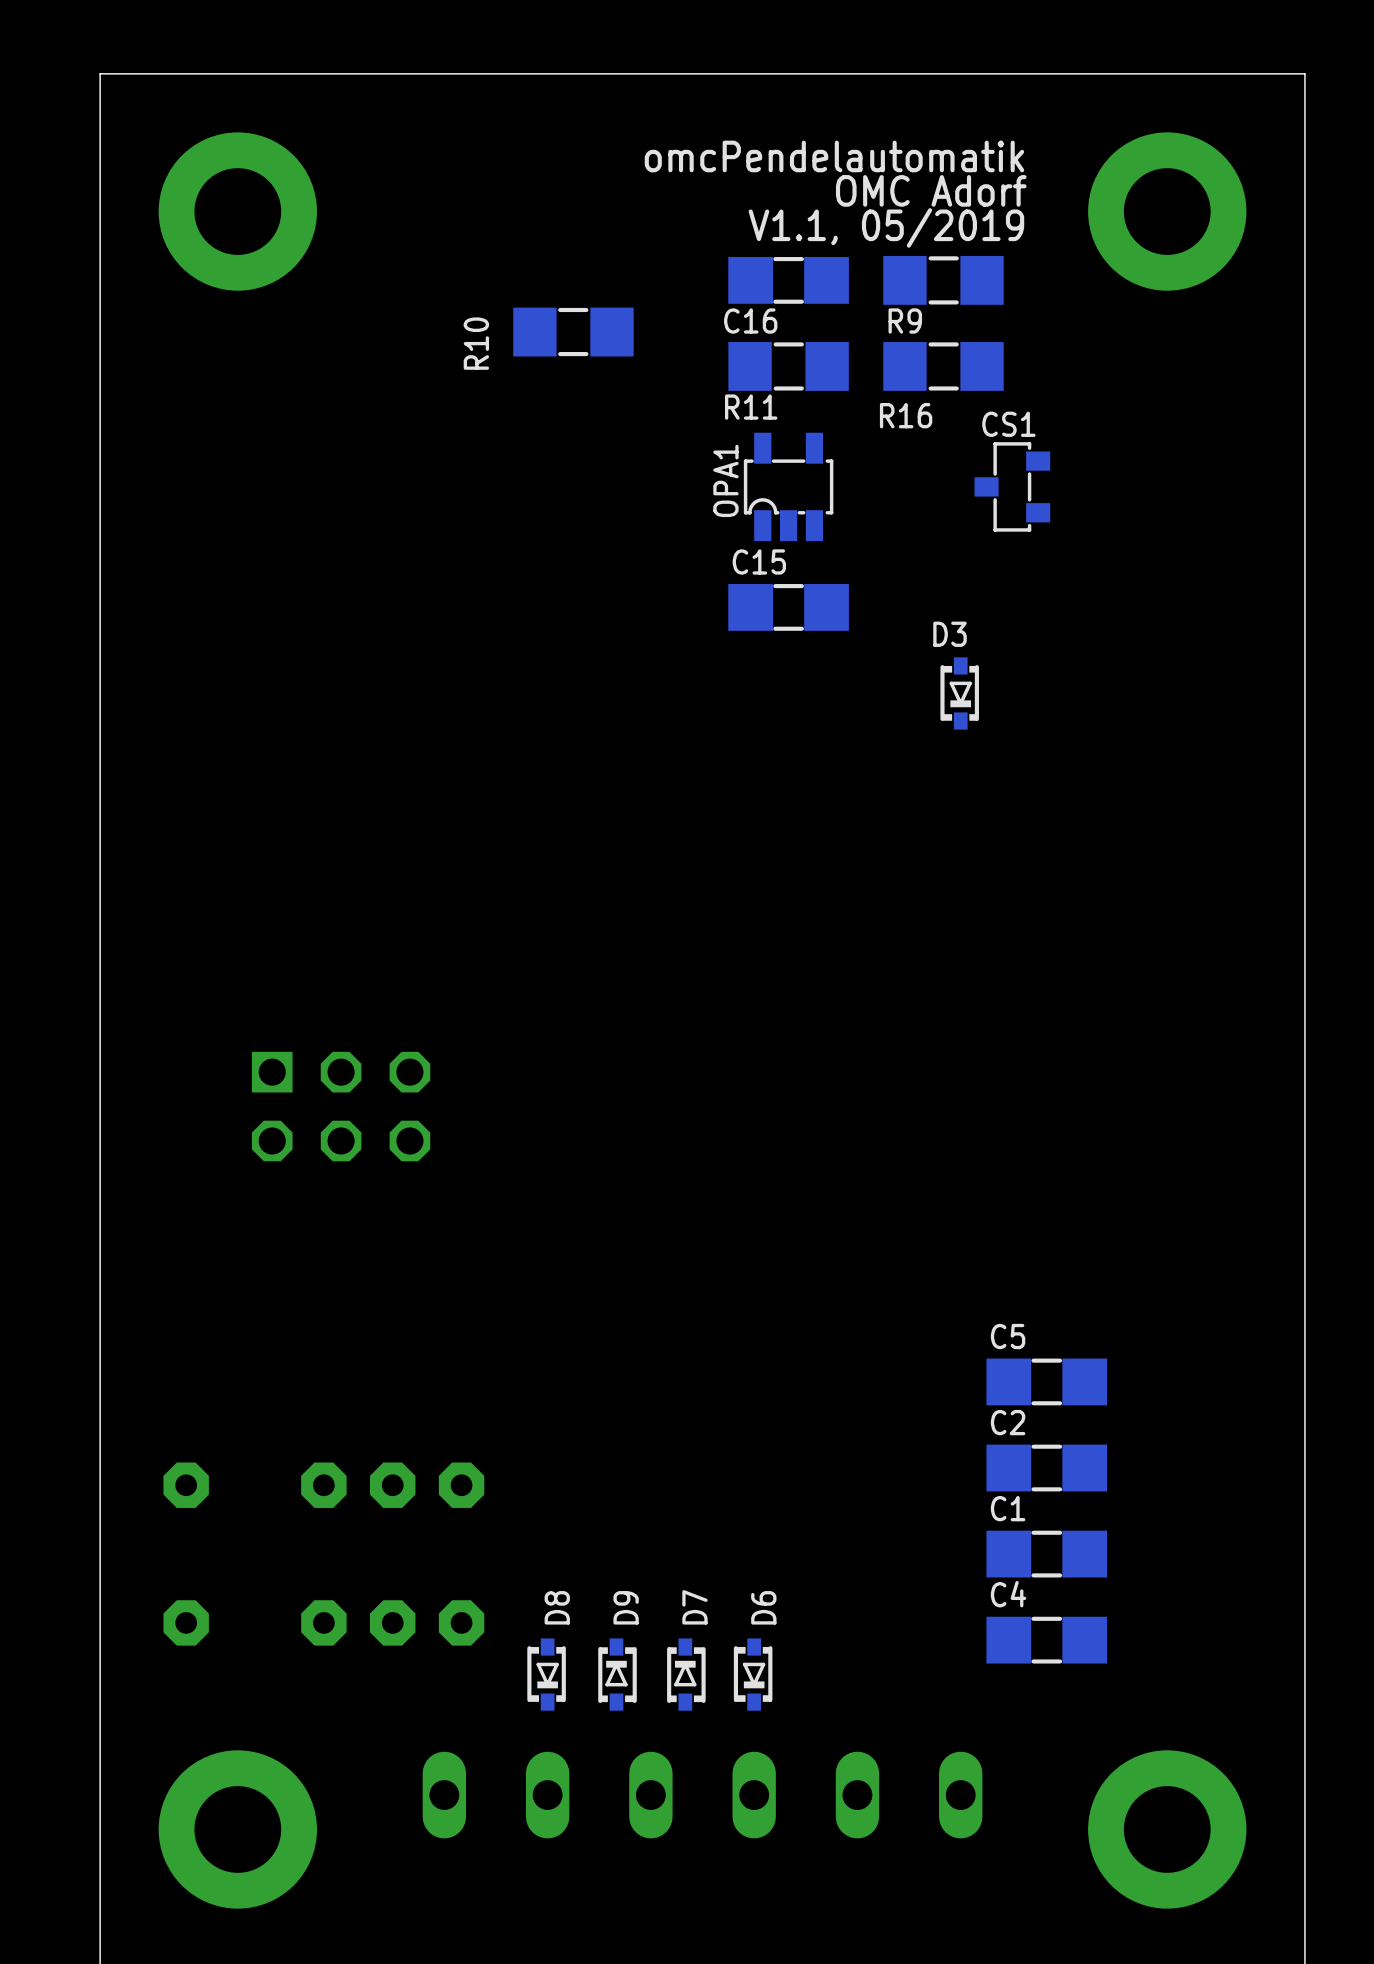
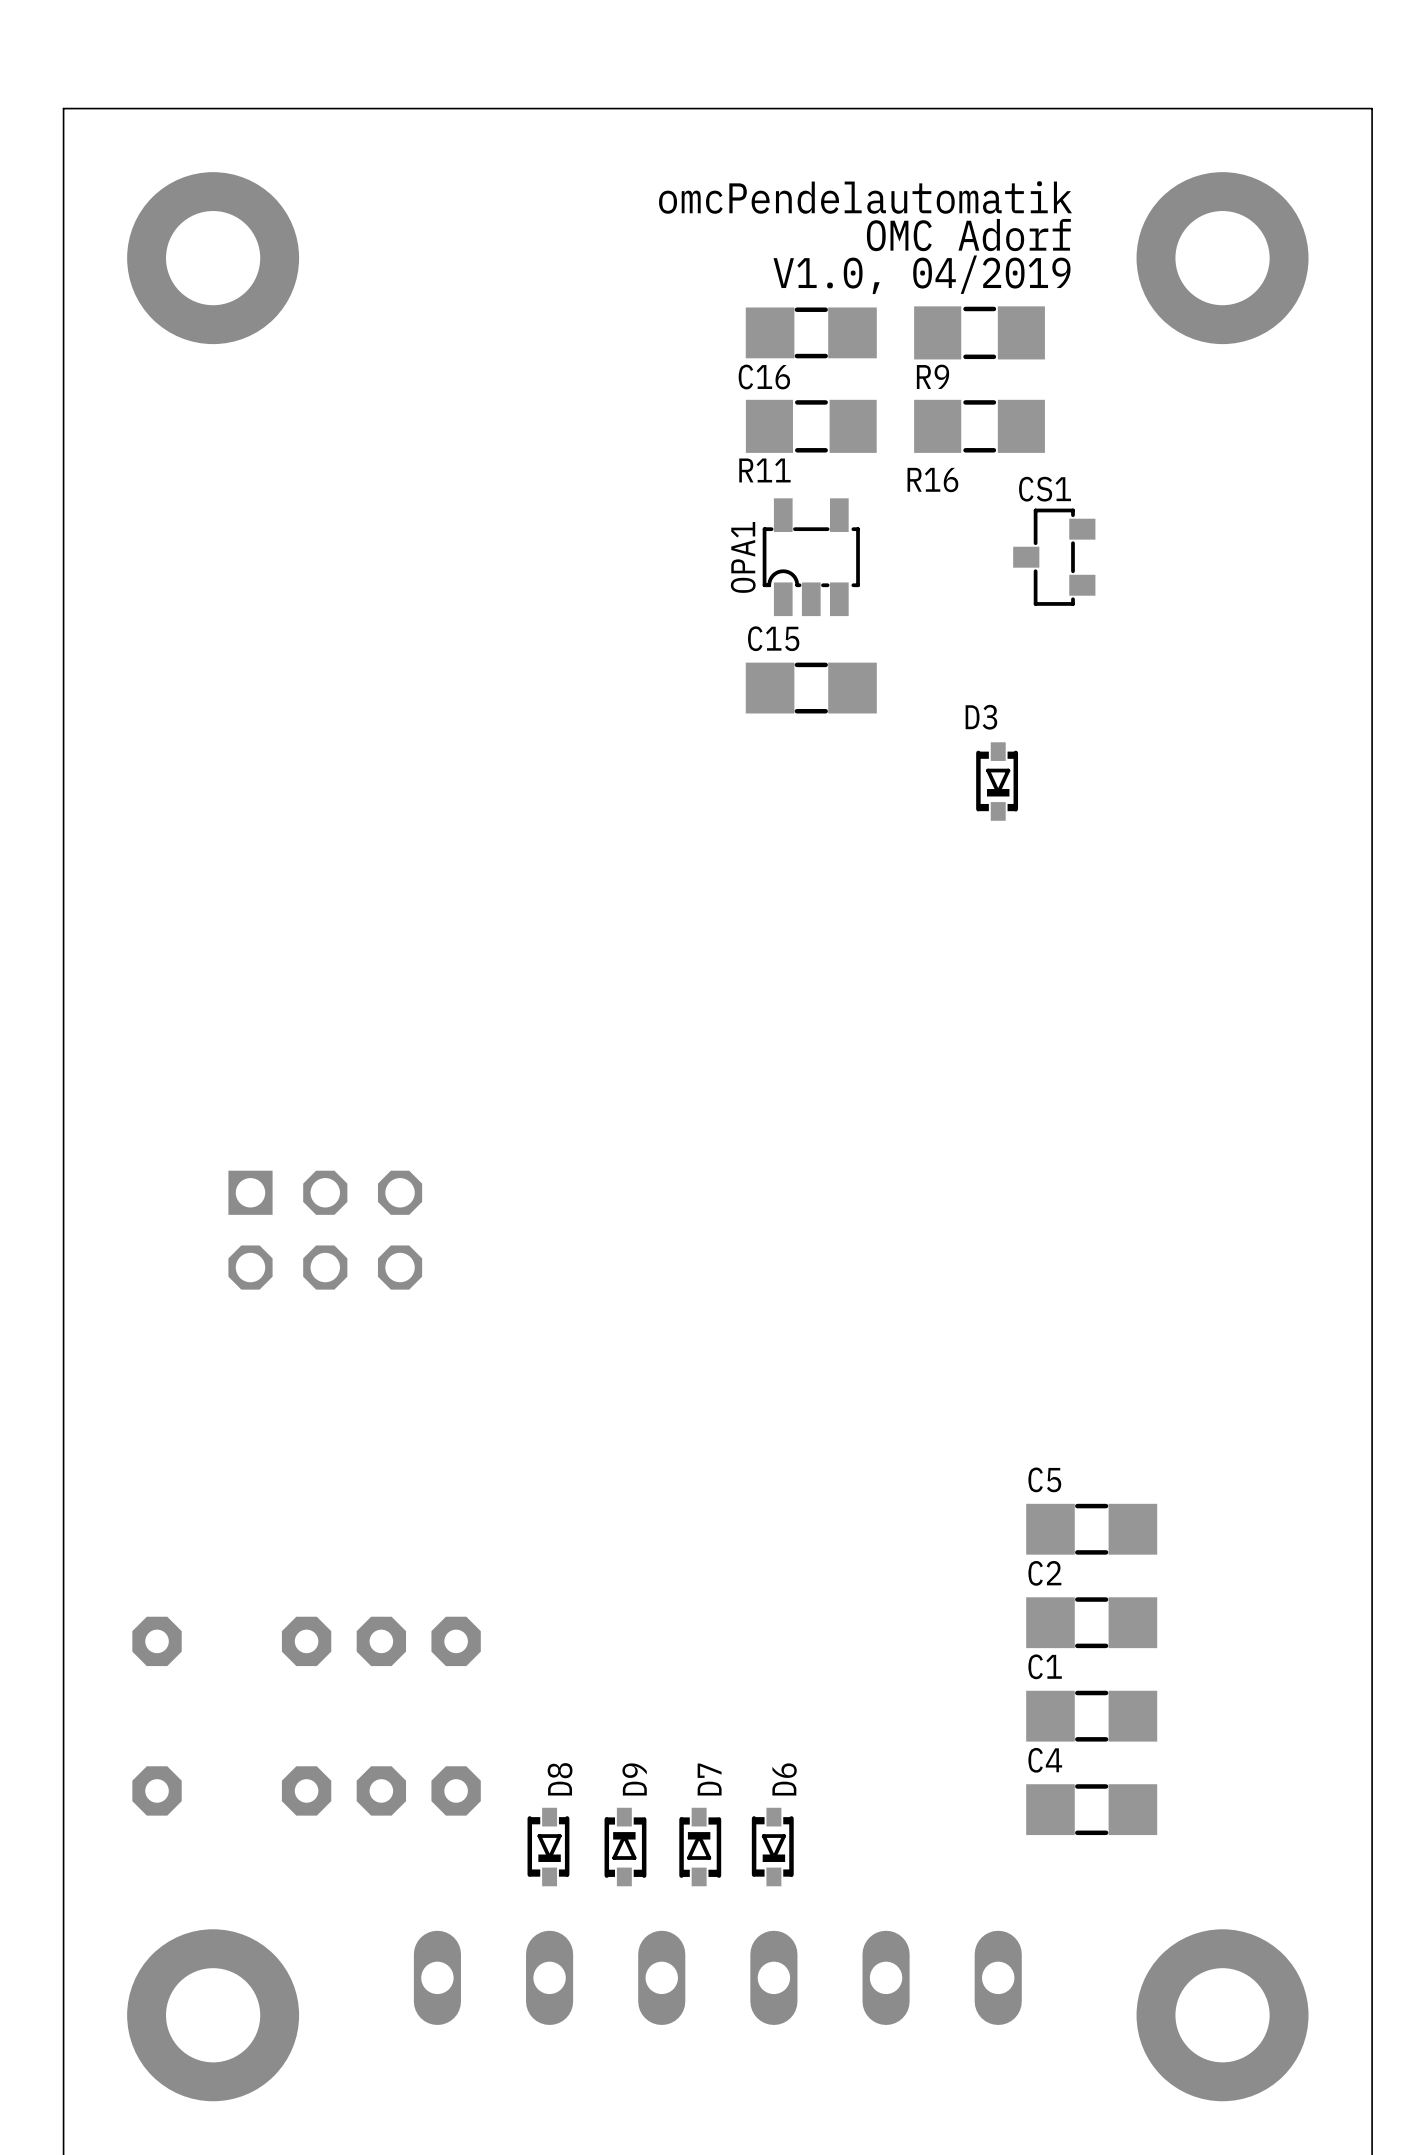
text: V1.1, 05/2019 (886, 227) -> V1.0, 04/2019 (922, 274)
R10: (573, 332) -> none

